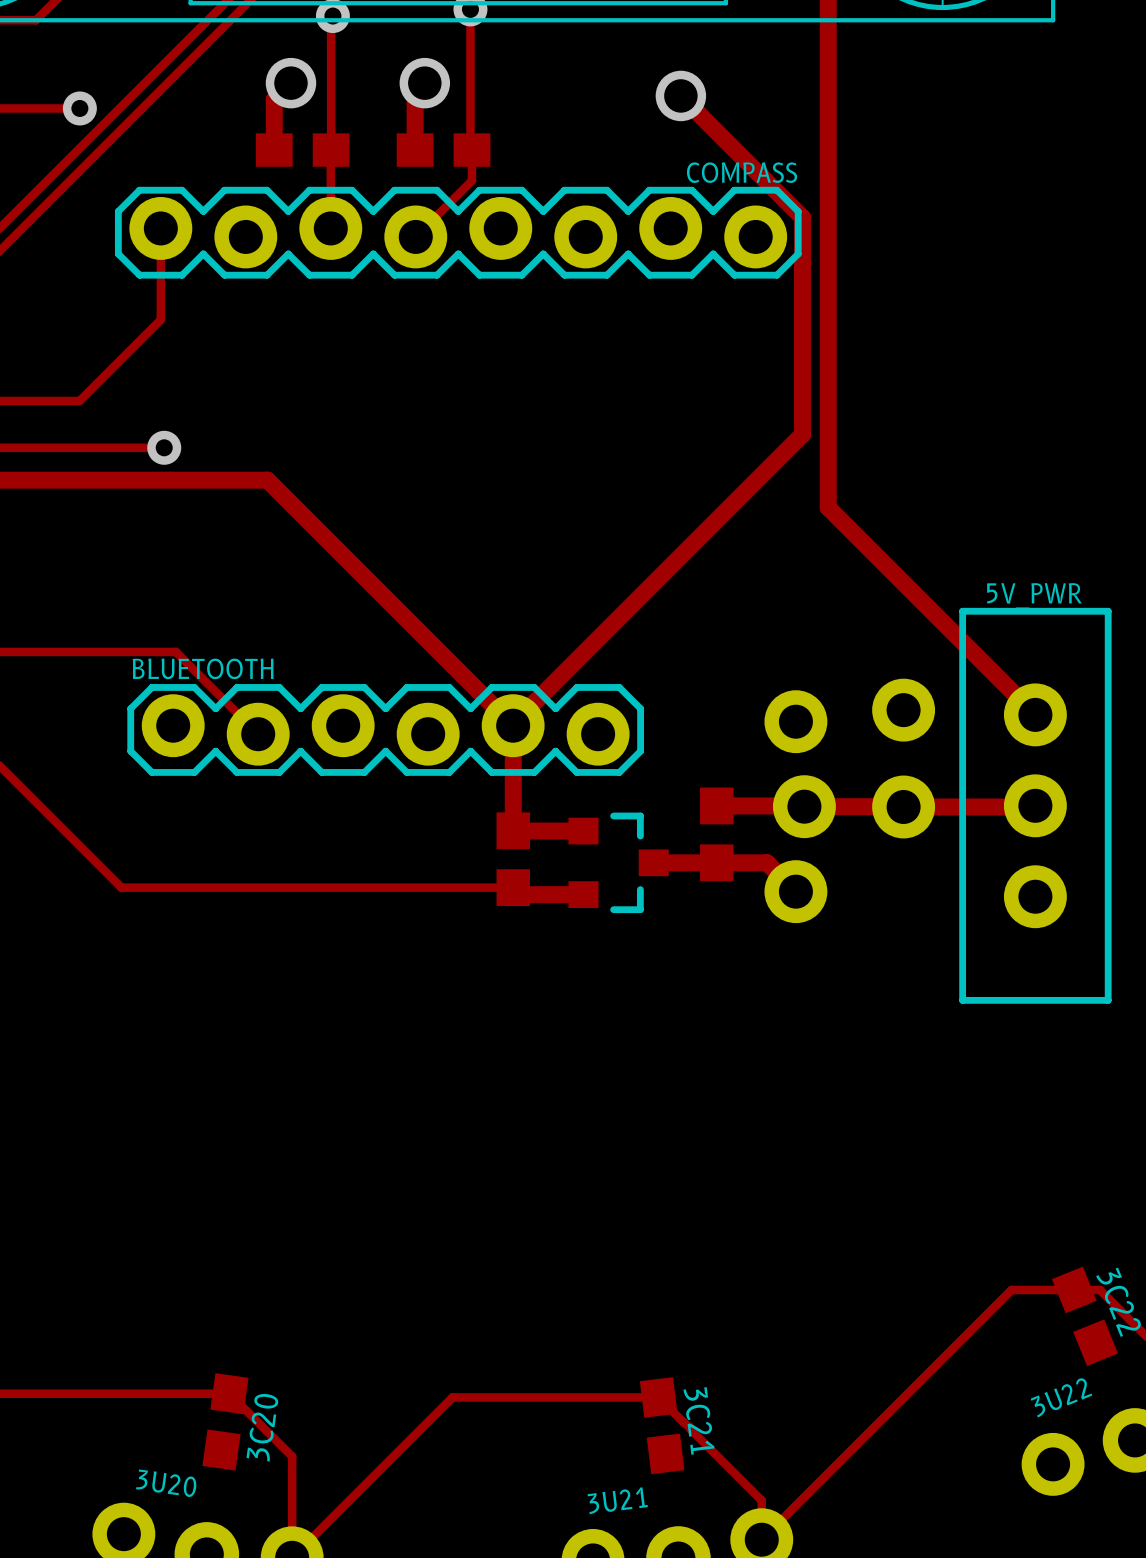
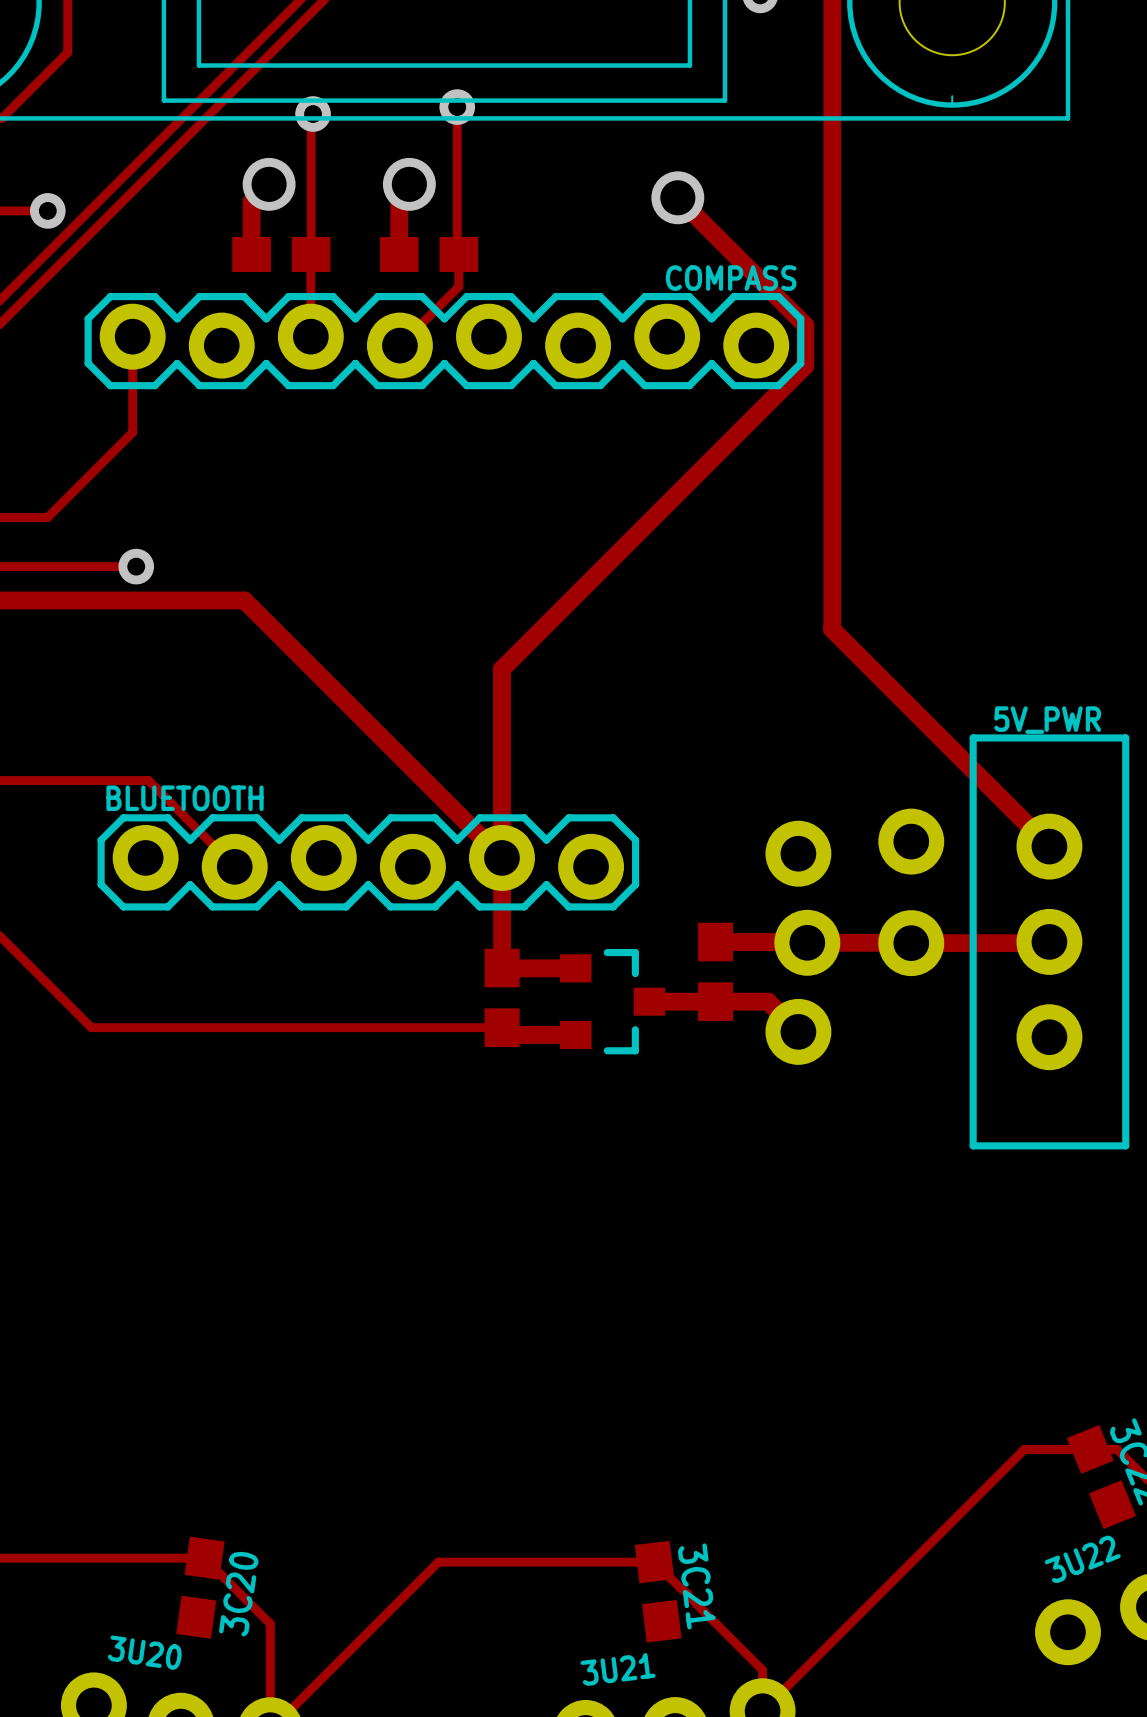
track: (802, 256) (802, 434) (513, 723) -> (805, 365) (501, 669) (501, 856)

